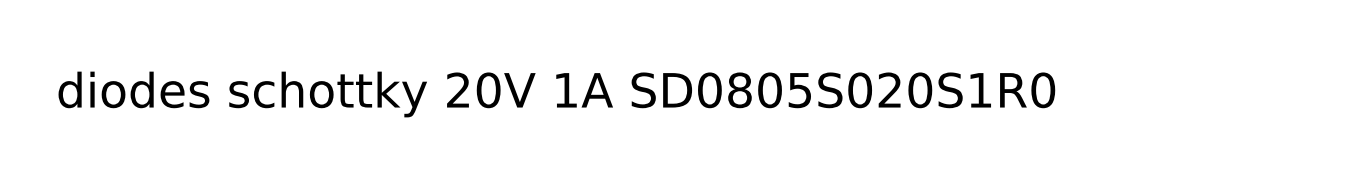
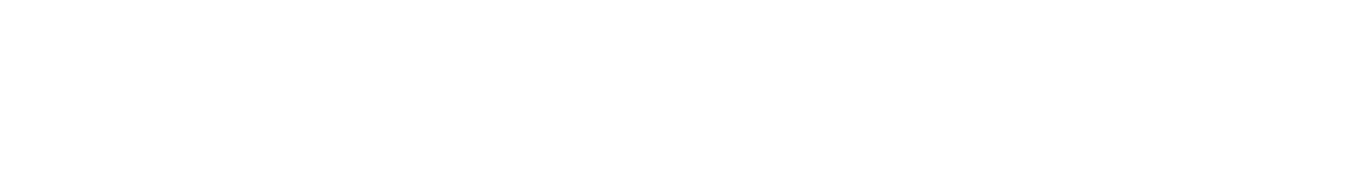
text: diodes schottky 20V 1A SD0805S020S1R0 (556, 94) -> none

